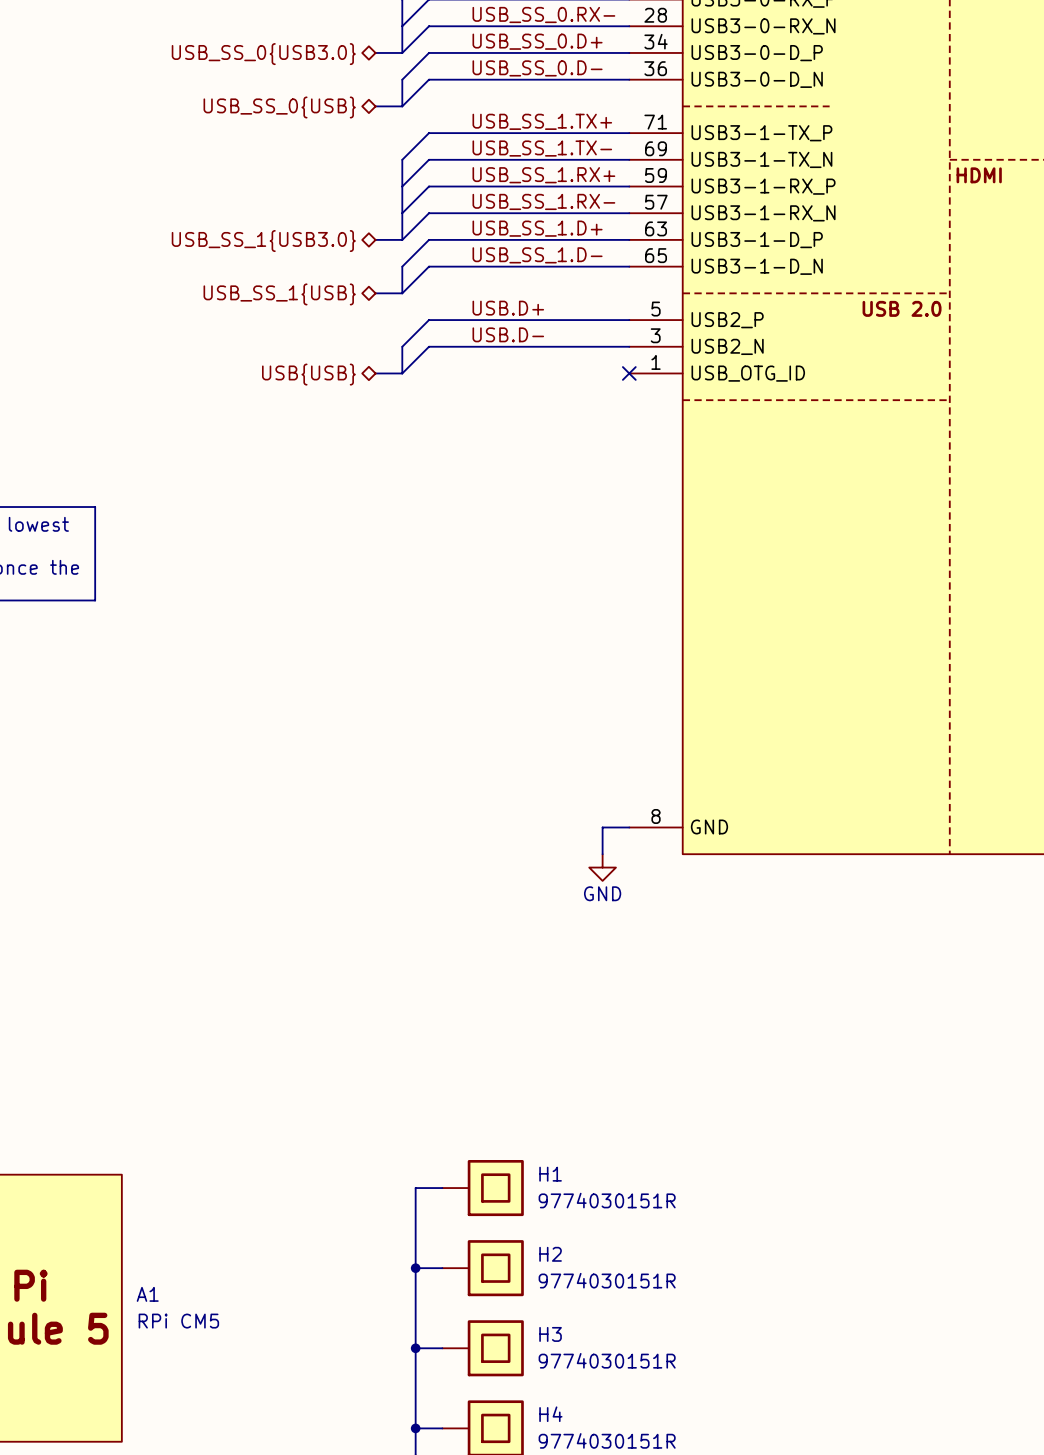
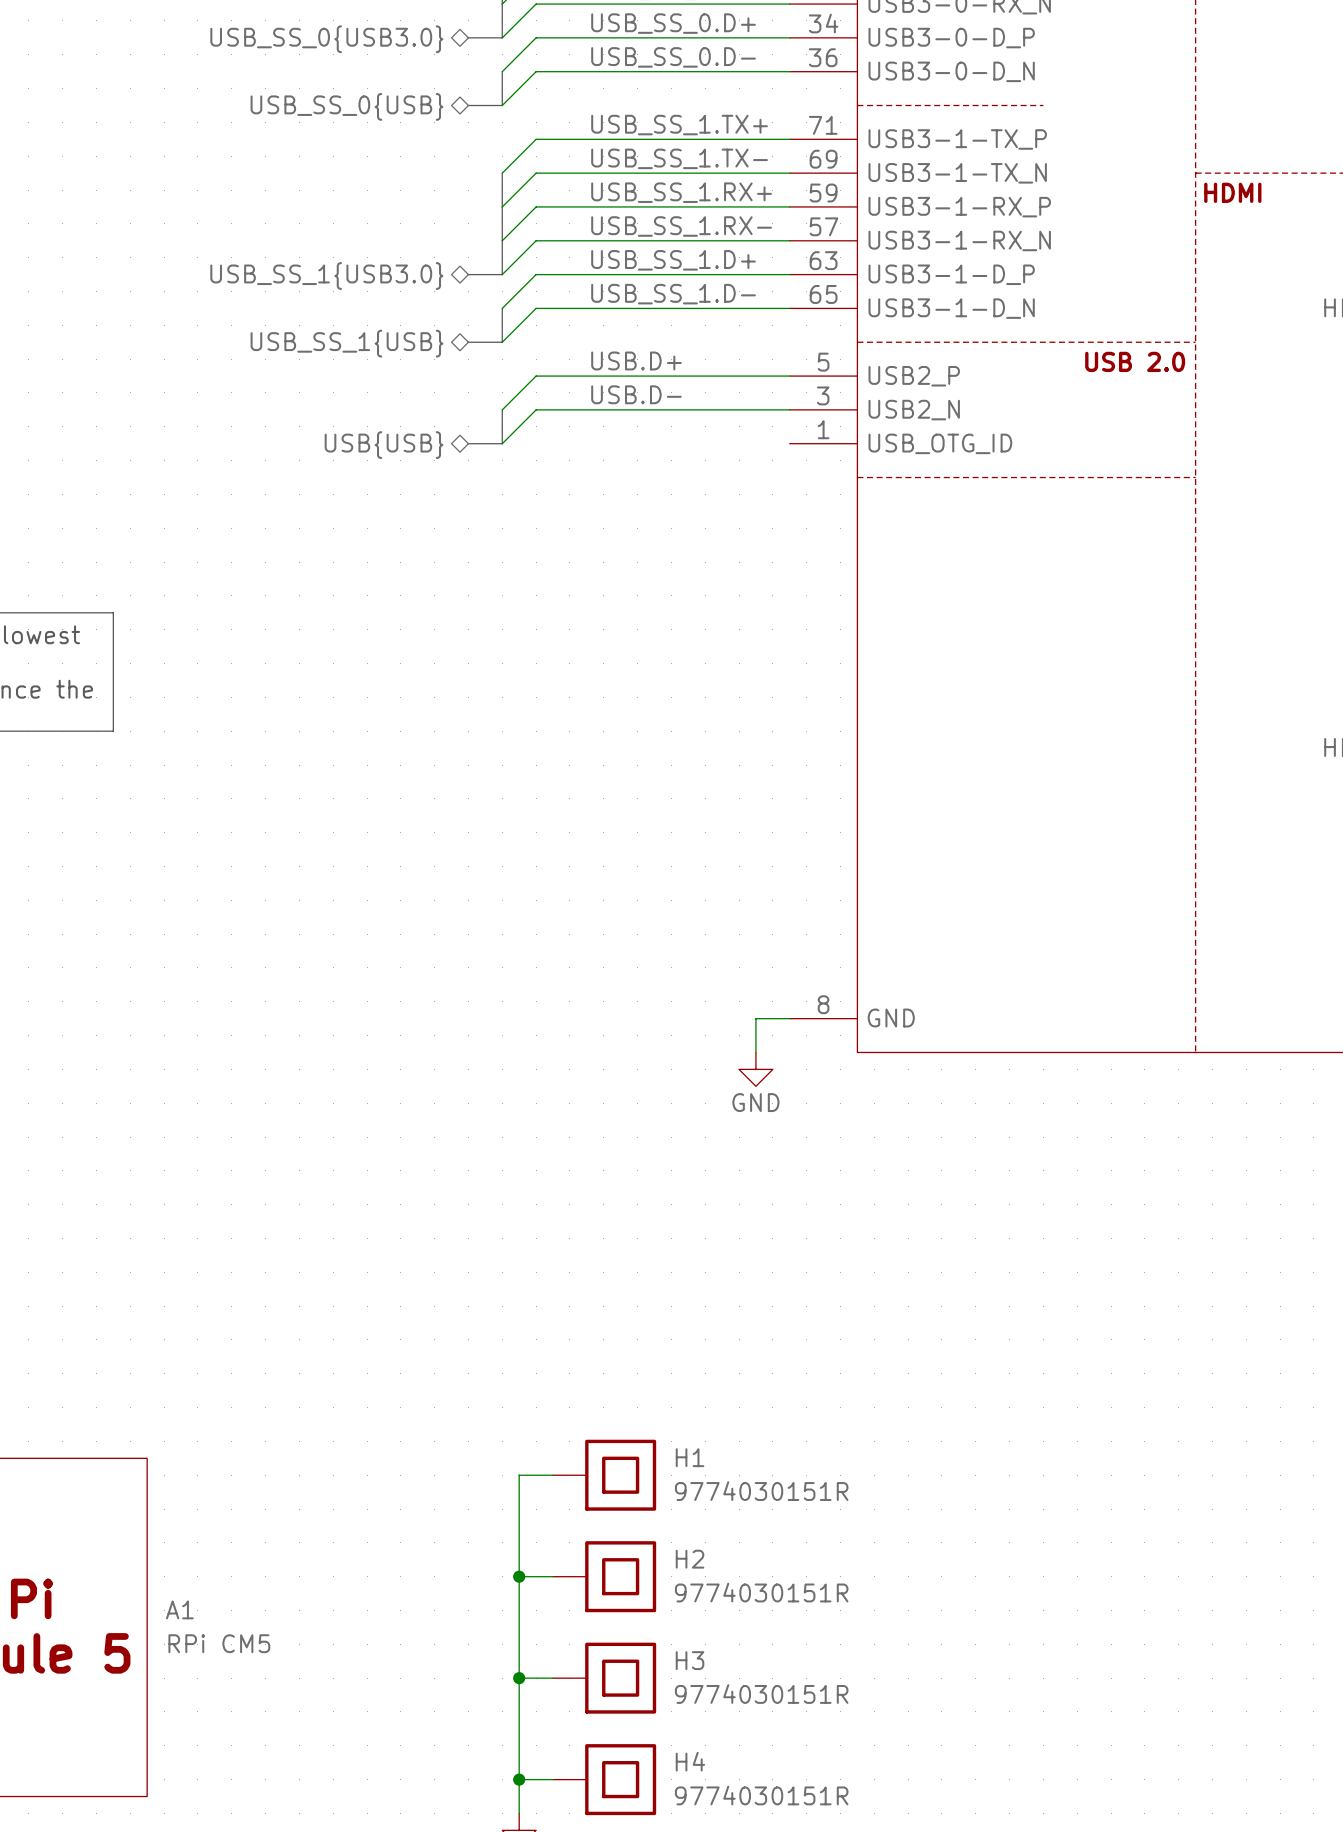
no-connect mark: (629, 373) -> none

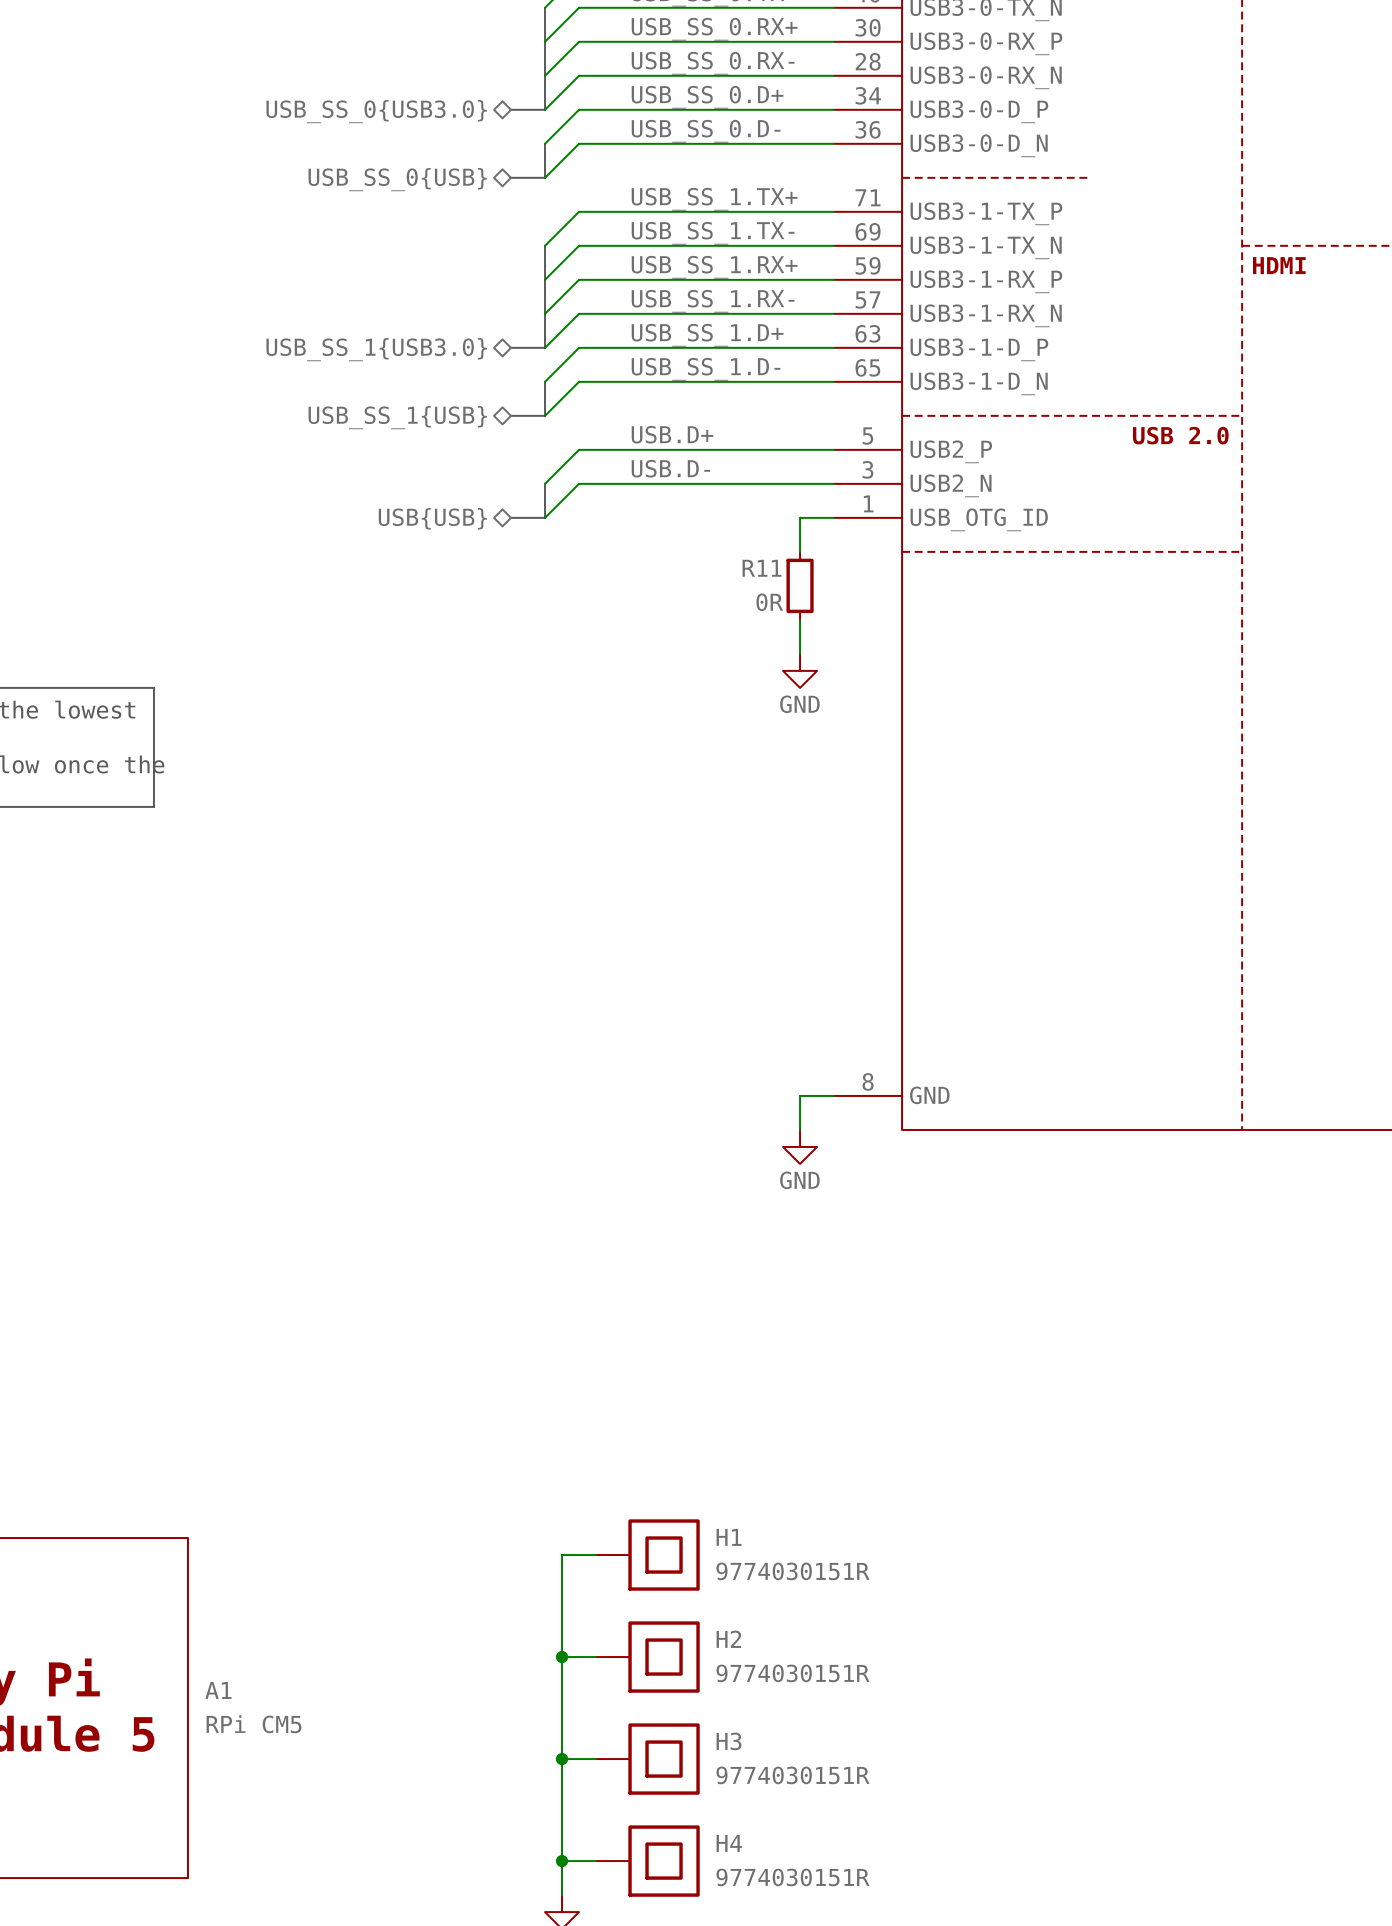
wire: none -> (834, 517) (800, 517) (800, 551)
R11: none -> (800, 585)
wire: none -> (800, 619) (800, 653)
power symbol: none -> GND (800, 670)

